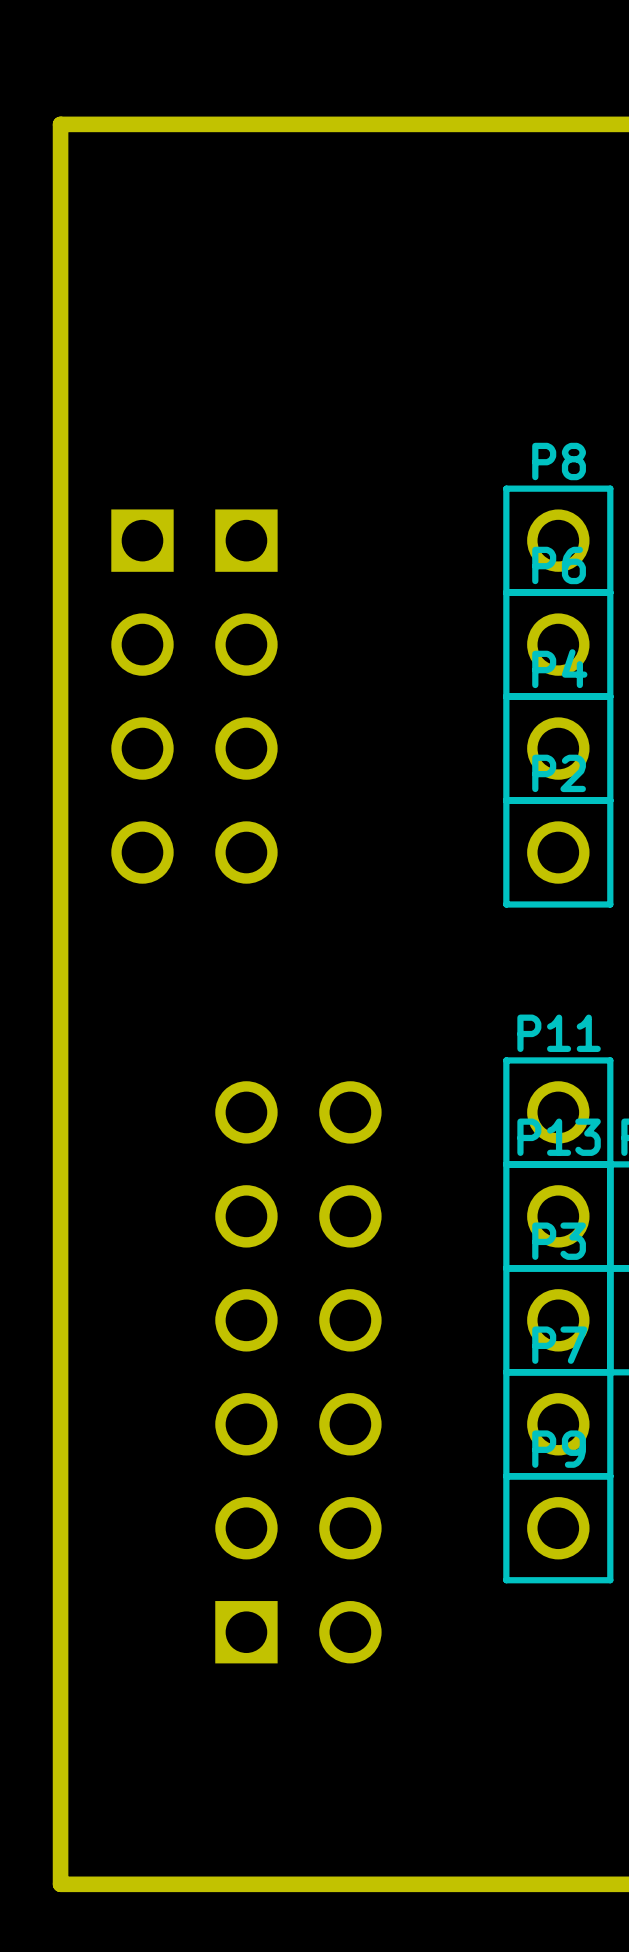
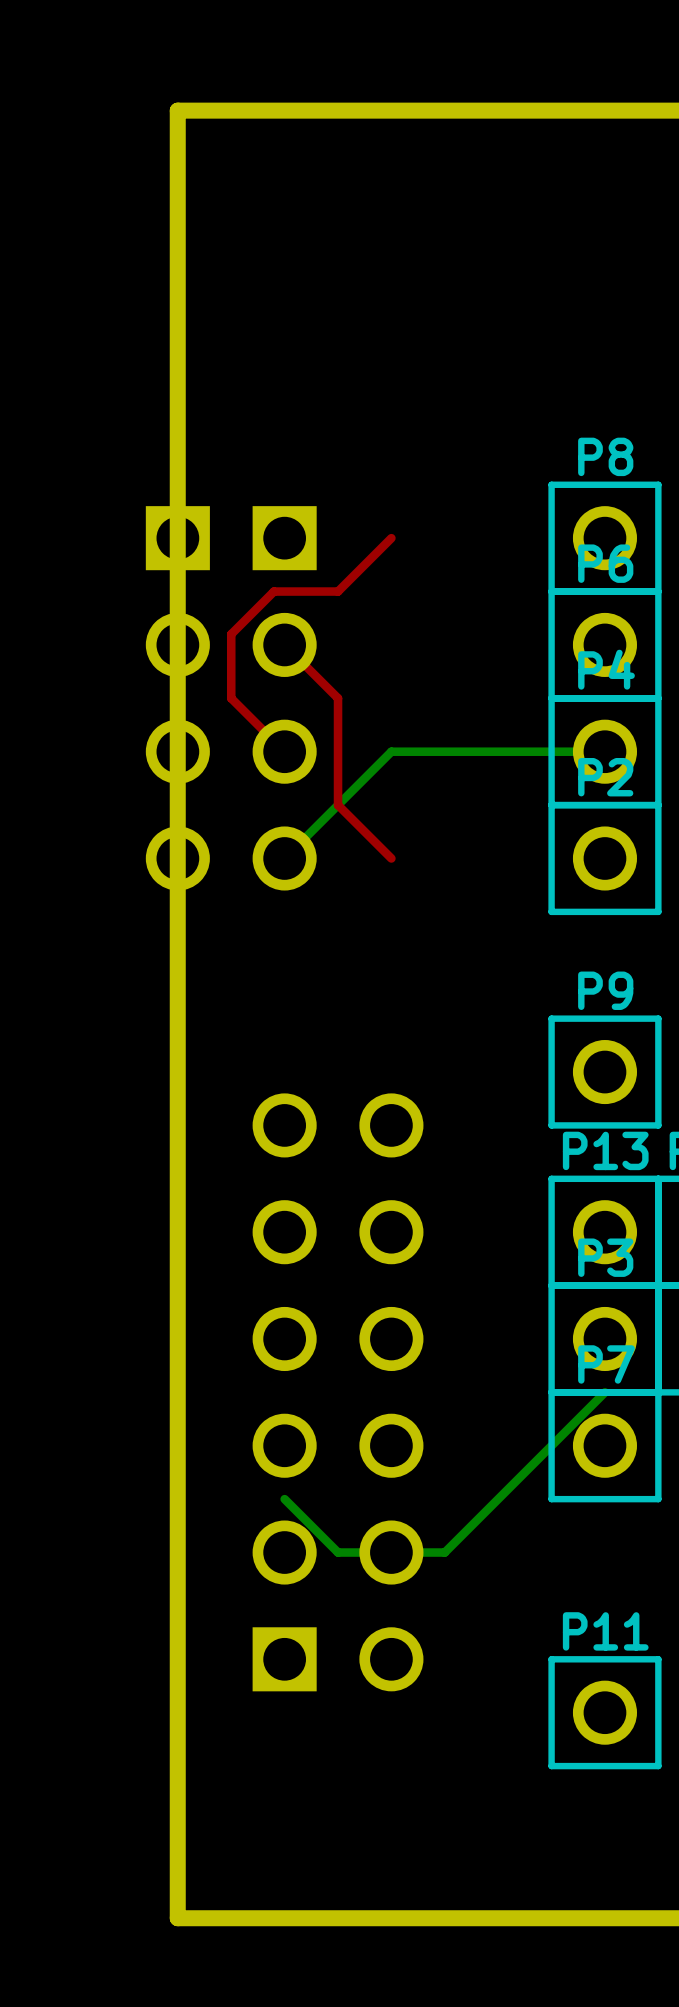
board edge: (142, 124) (60, 124) (60, 1884) (142, 1884) -> (177, 110) (177, 1918)
top track: none -> (391, 538) (338, 591) (273, 591) (231, 634) (231, 698) (284, 751)
top track: none -> (284, 644) (338, 698) (338, 805) (391, 858)
bottom track: none -> (604, 751) (391, 751) (284, 858)
P11 position: (558, 1112) -> (604, 1712)
bottom track: none -> (604, 1392) (444, 1552) (338, 1552) (284, 1499)
P9 position: (558, 1528) -> (604, 1072)

